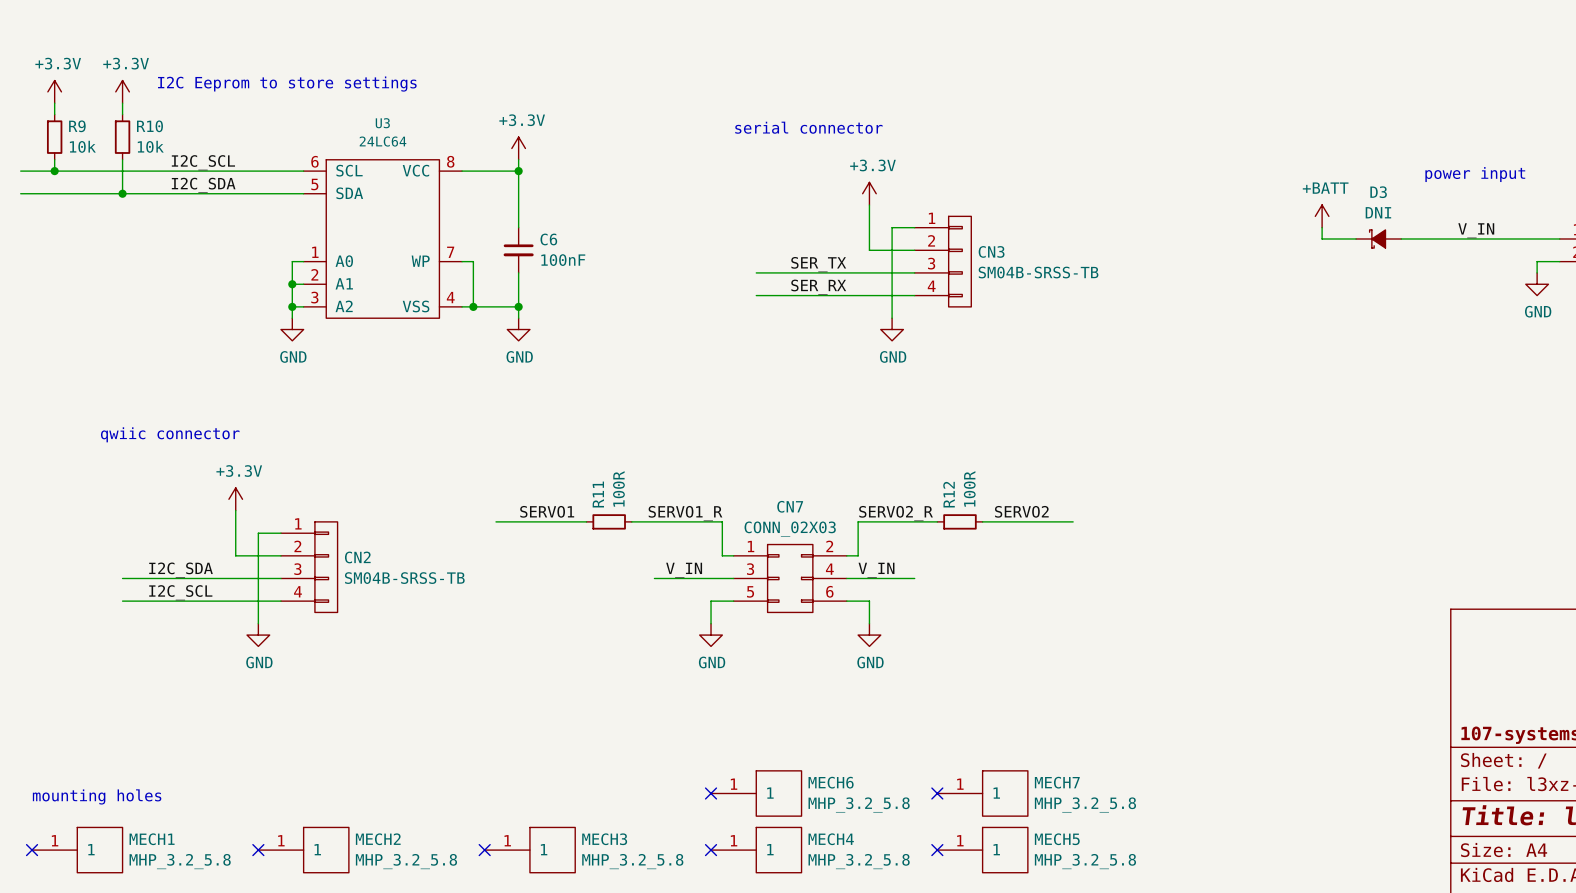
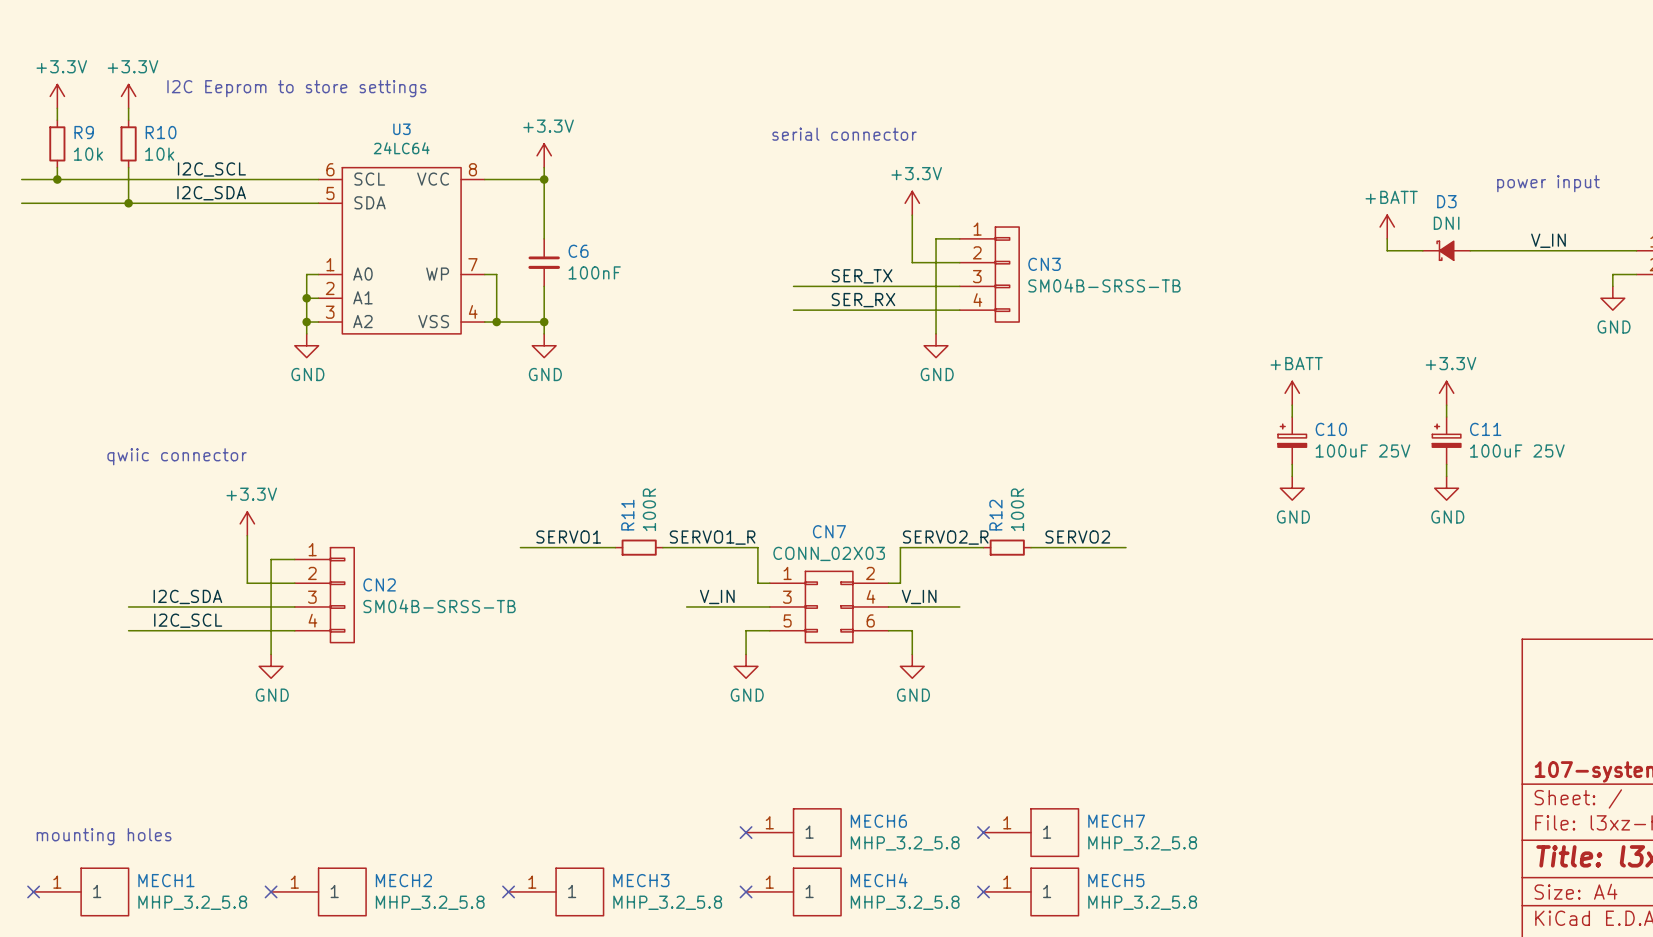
power symbol: none -> +BATT (1292, 393)
power symbol: none -> +3.3V (1446, 393)
wire: none -> (1292, 405) (1292, 417)
wire: none -> (1446, 405) (1446, 417)
C10: none -> 100uF 25V (1292, 440)
C11: none -> 100uF 25V (1446, 440)
wire: none -> (1292, 464) (1292, 476)
wire: none -> (1446, 464) (1446, 476)
power symbol: none -> GND (1292, 488)
power symbol: none -> GND (1446, 488)

